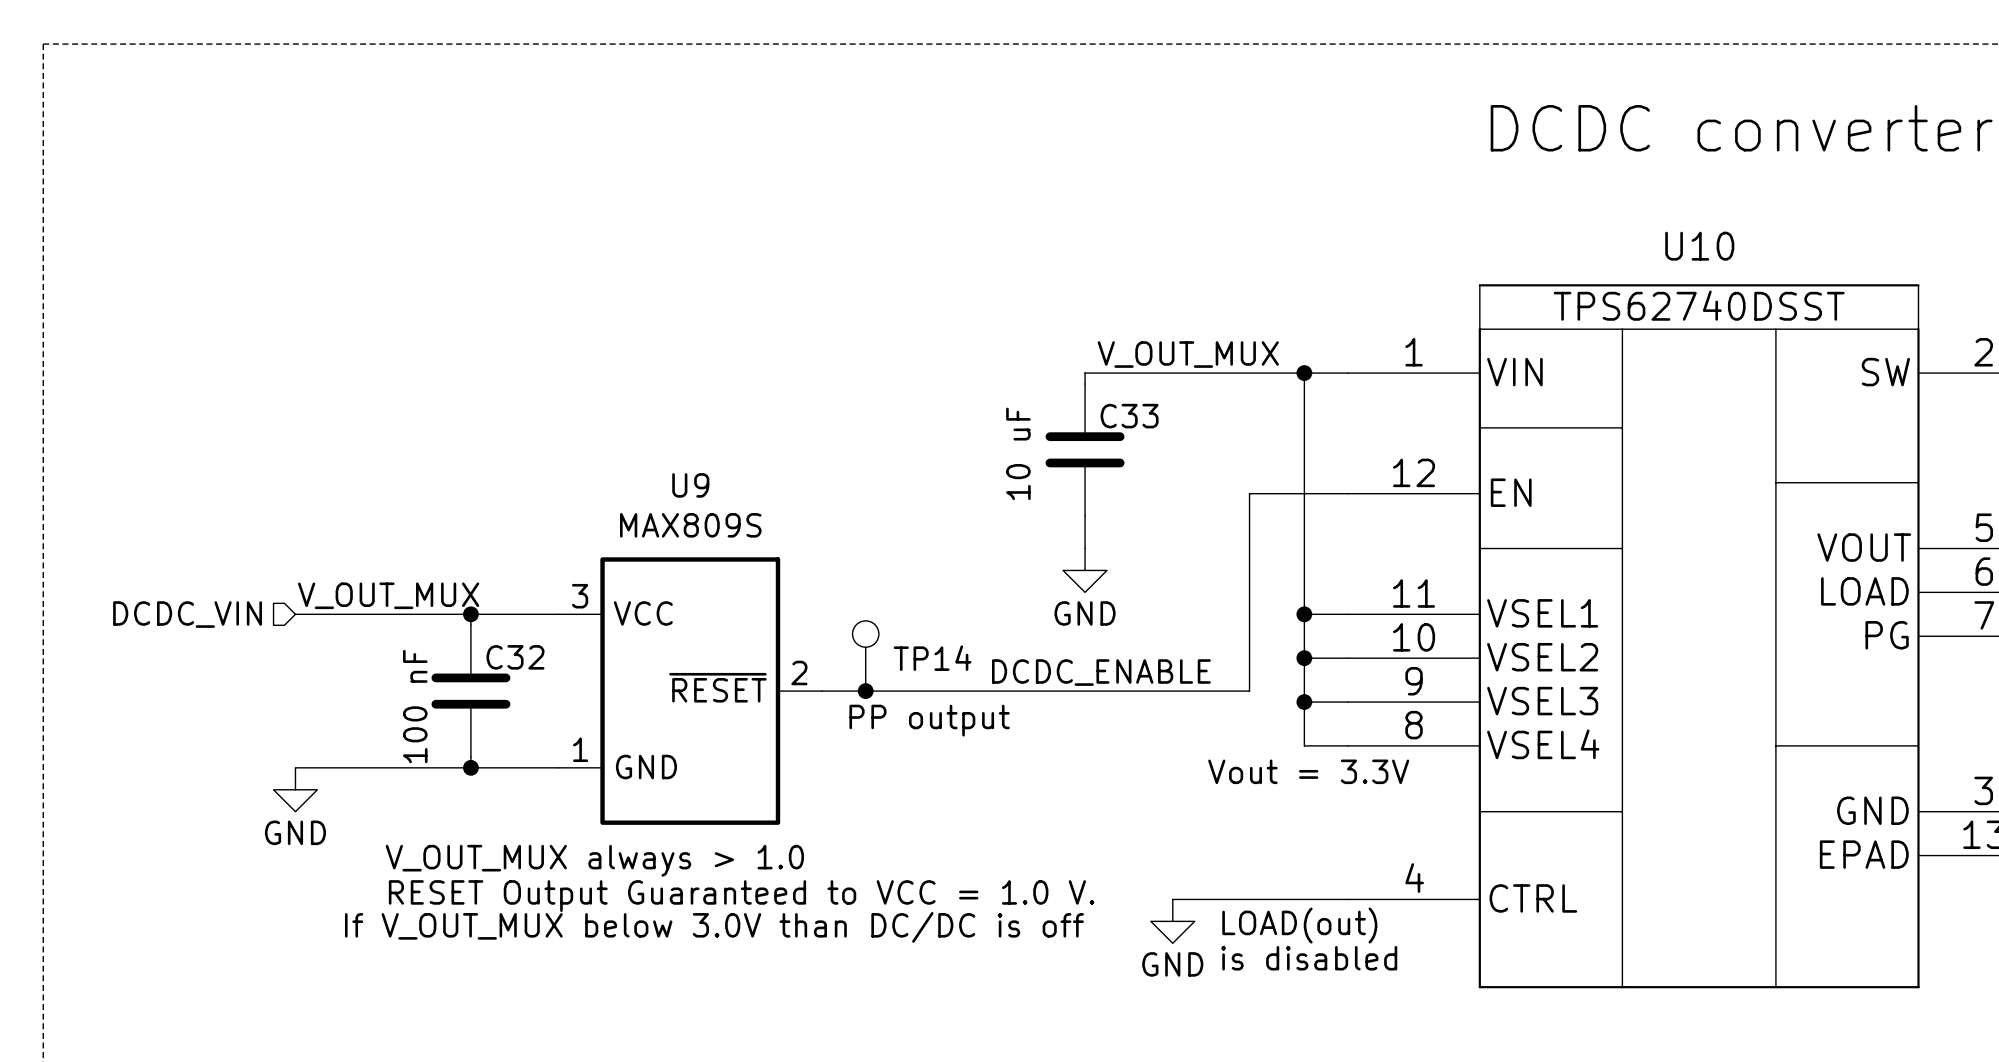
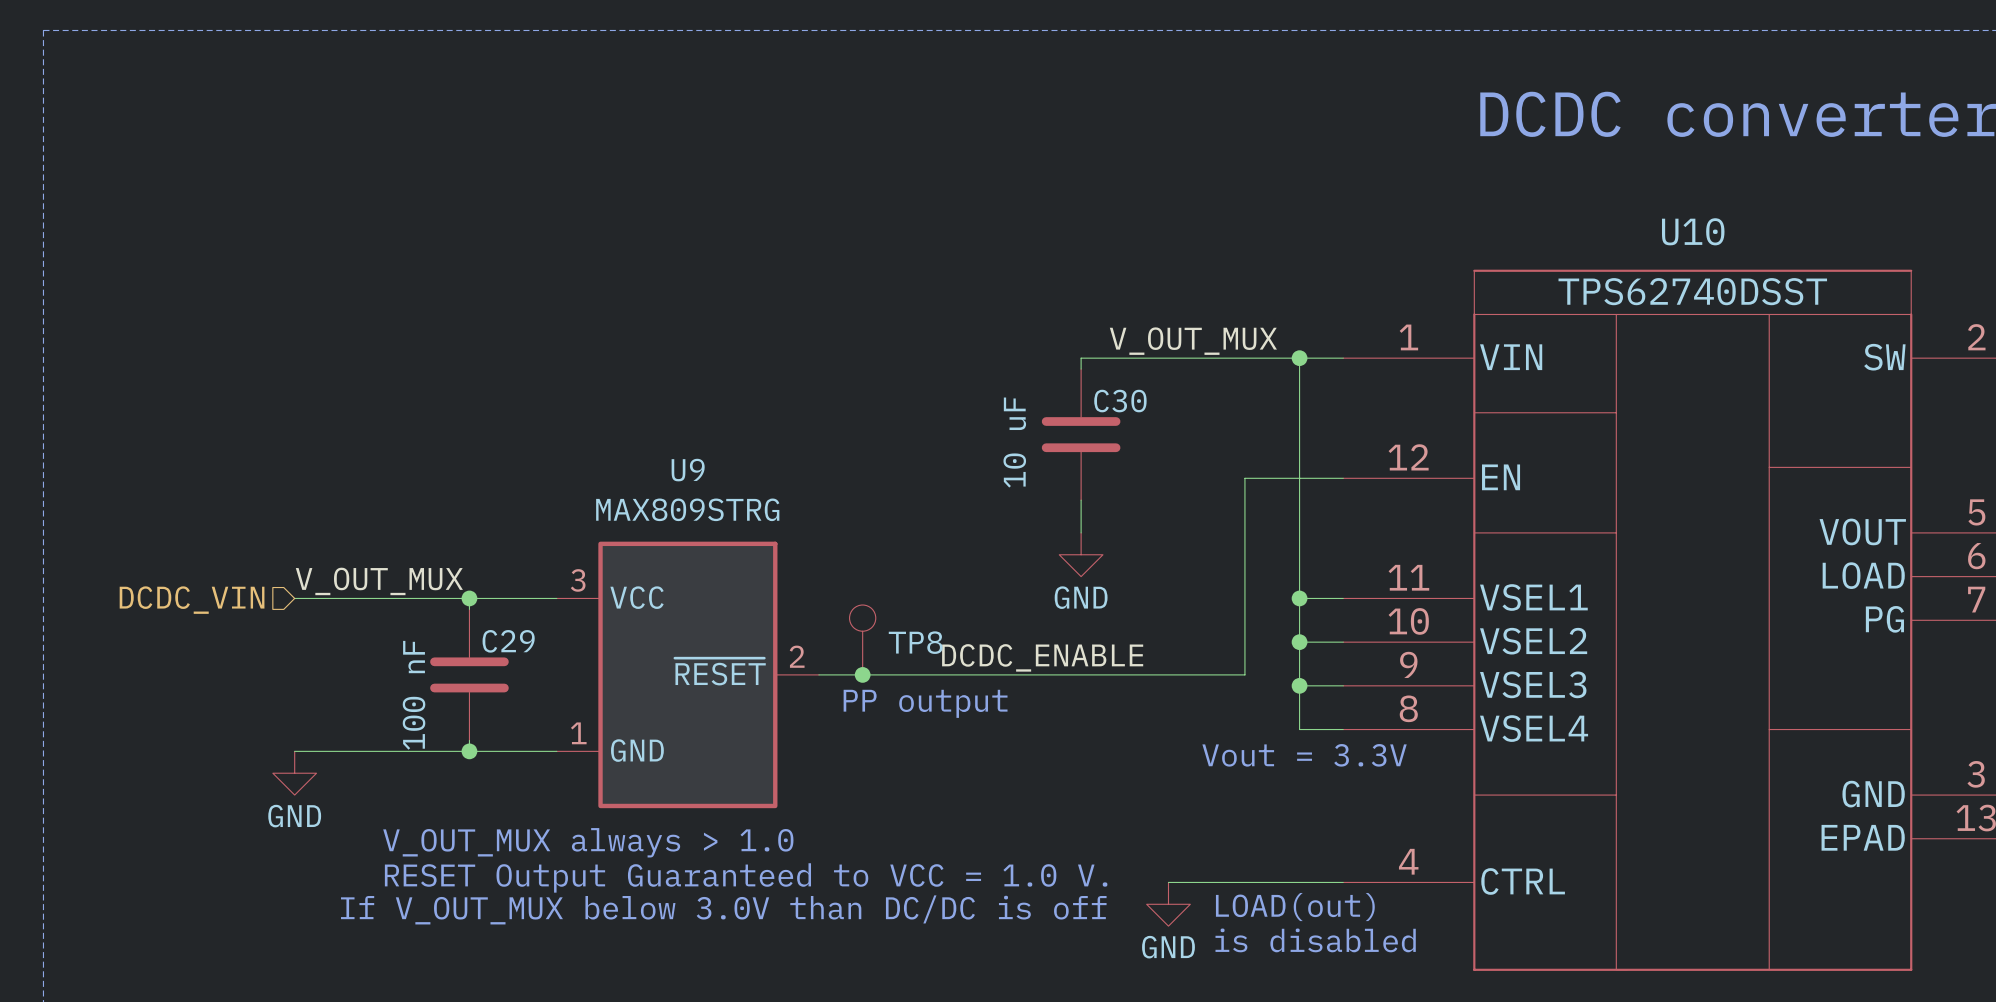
C33 name: C33 (1129, 416) -> C30 (1120, 401)
U9 value: MAX809S (690, 525) -> MAX809STRG (687, 509)
C32 name: C32 (515, 657) -> C29 (508, 641)
TP14 name: TP14 (932, 658) -> TP8 (915, 642)
label position: DCDC_ENABLE (1101, 672) -> DCDC_ENABLE (1042, 657)

